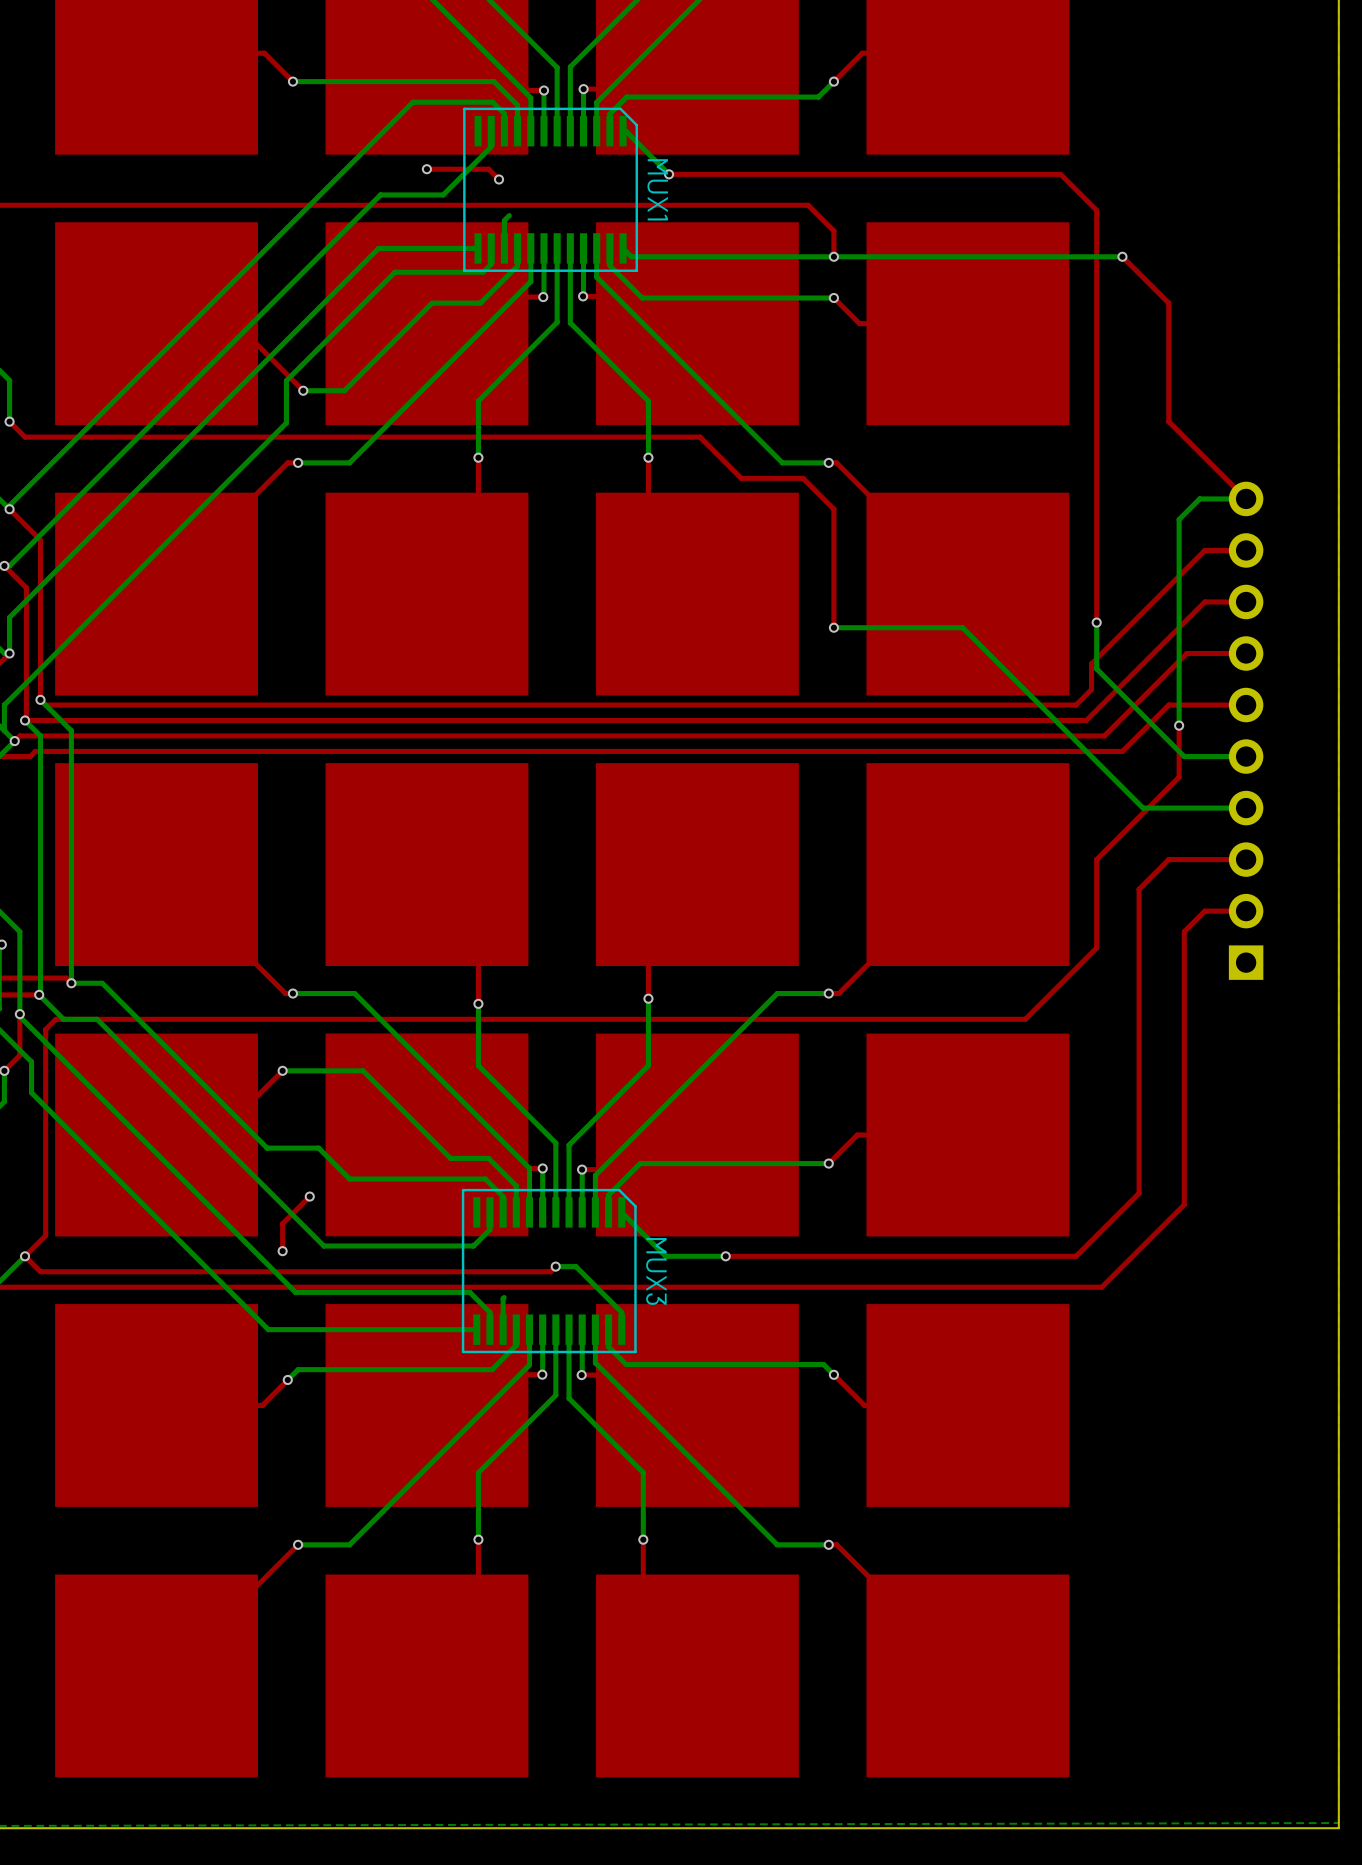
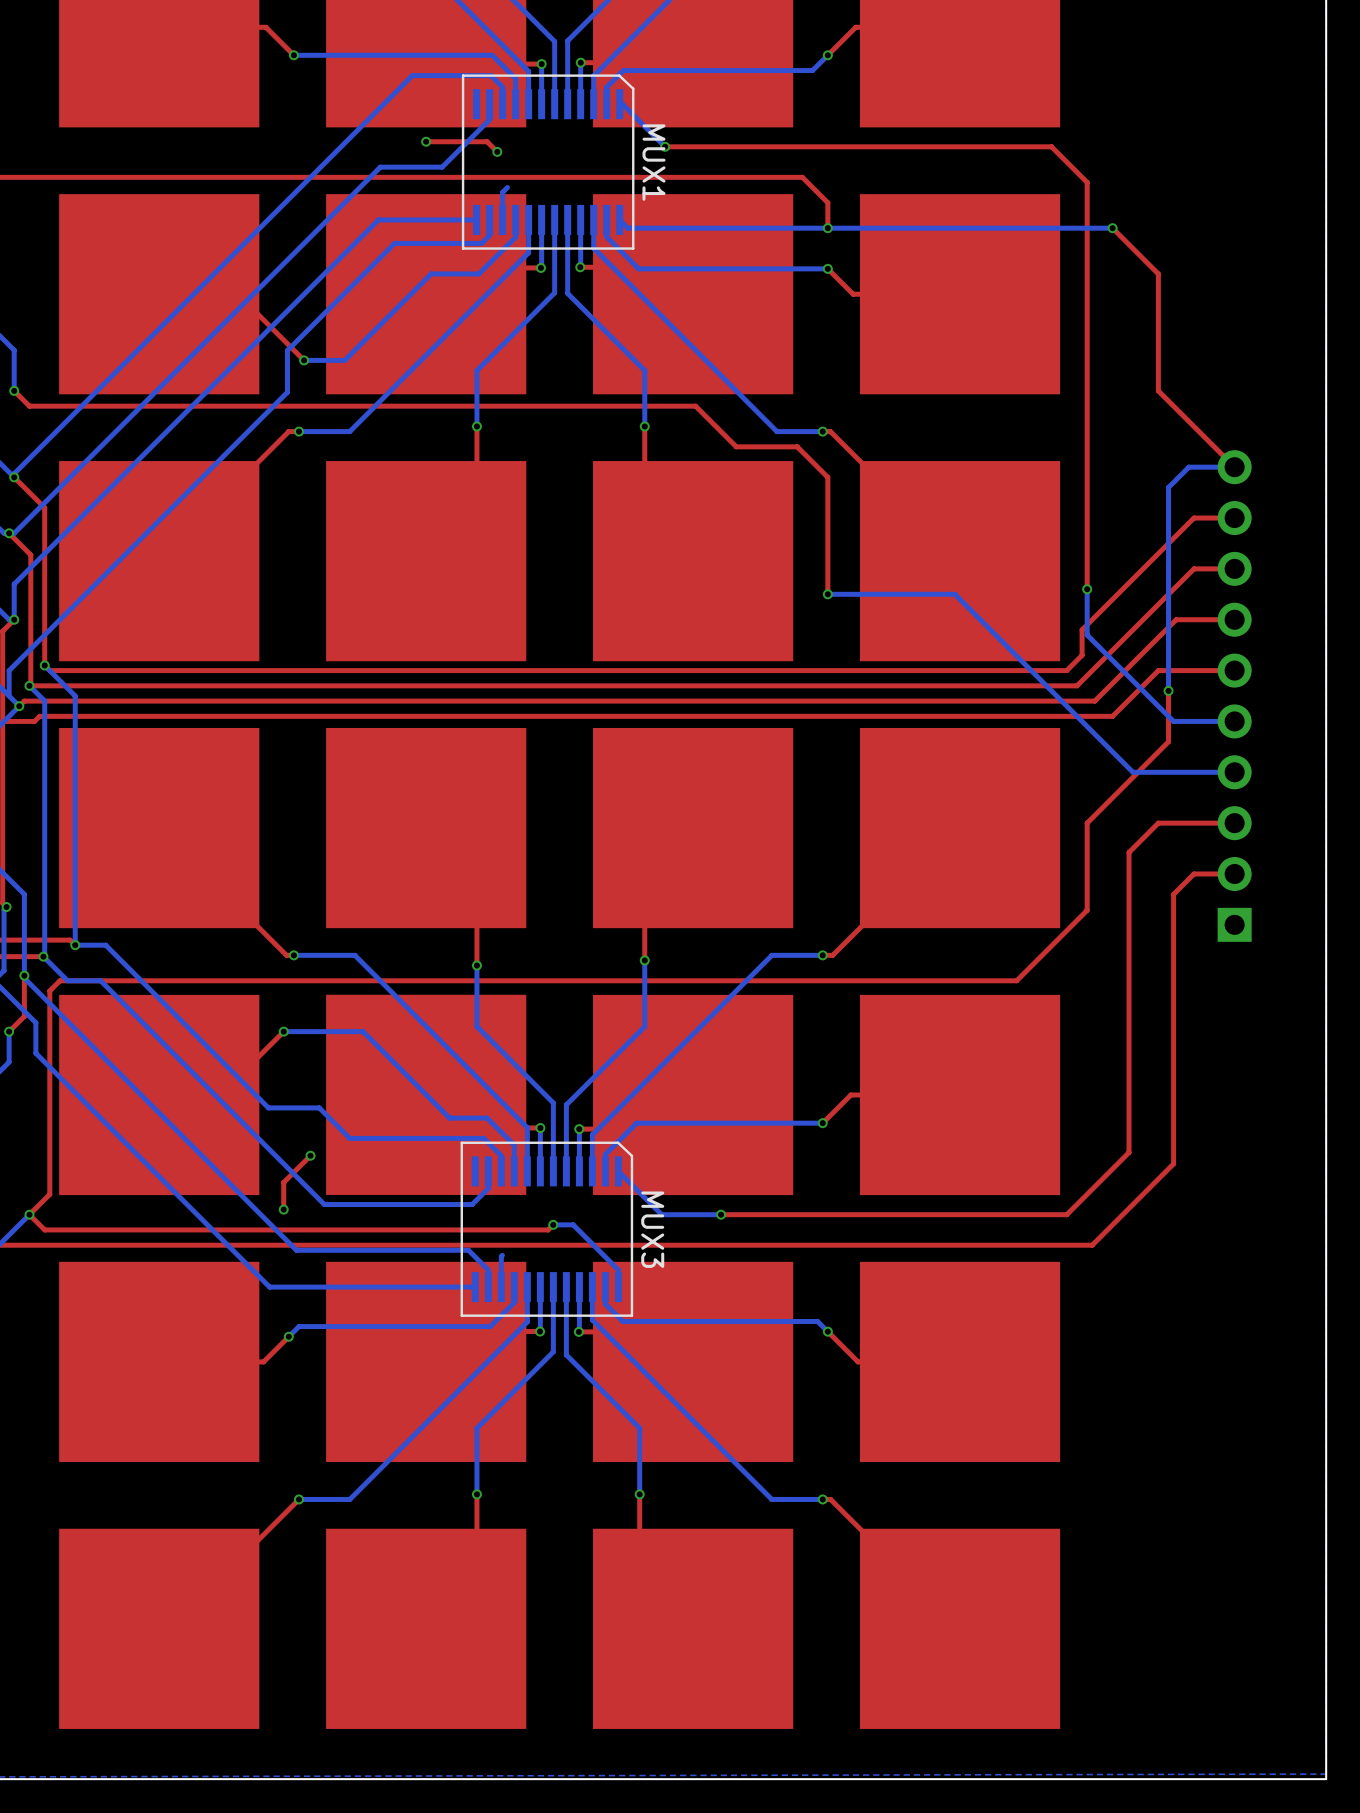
MUX1 footprint: [463, 107, 638, 272] -> [461, 74, 635, 250]
MUX3 footprint: [461, 1188, 637, 1354] -> [460, 1141, 634, 1317]

